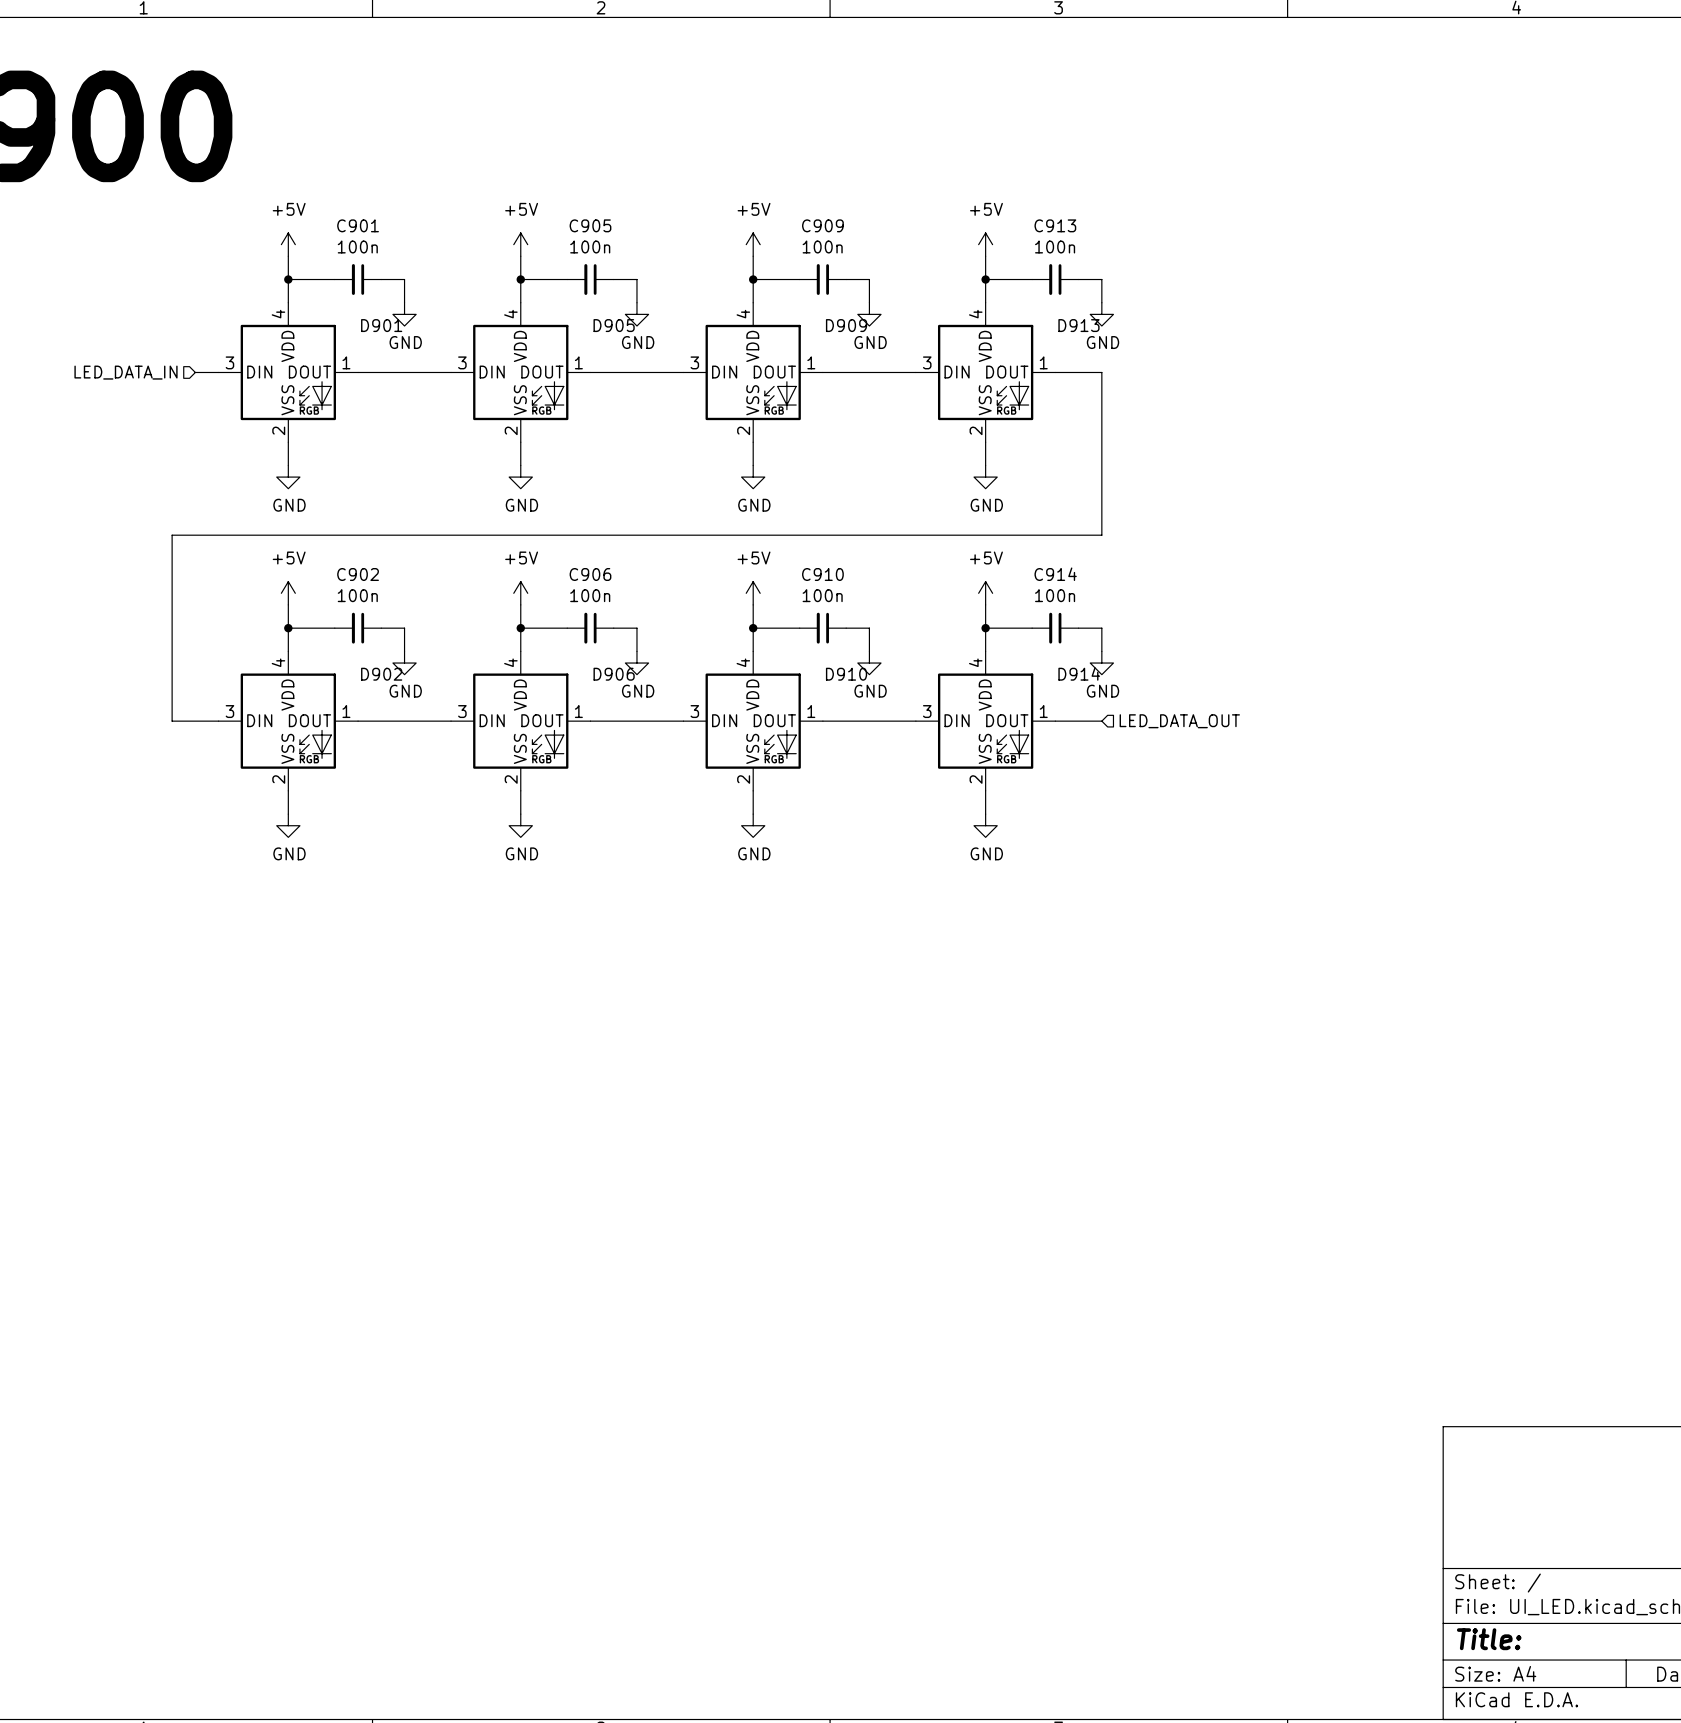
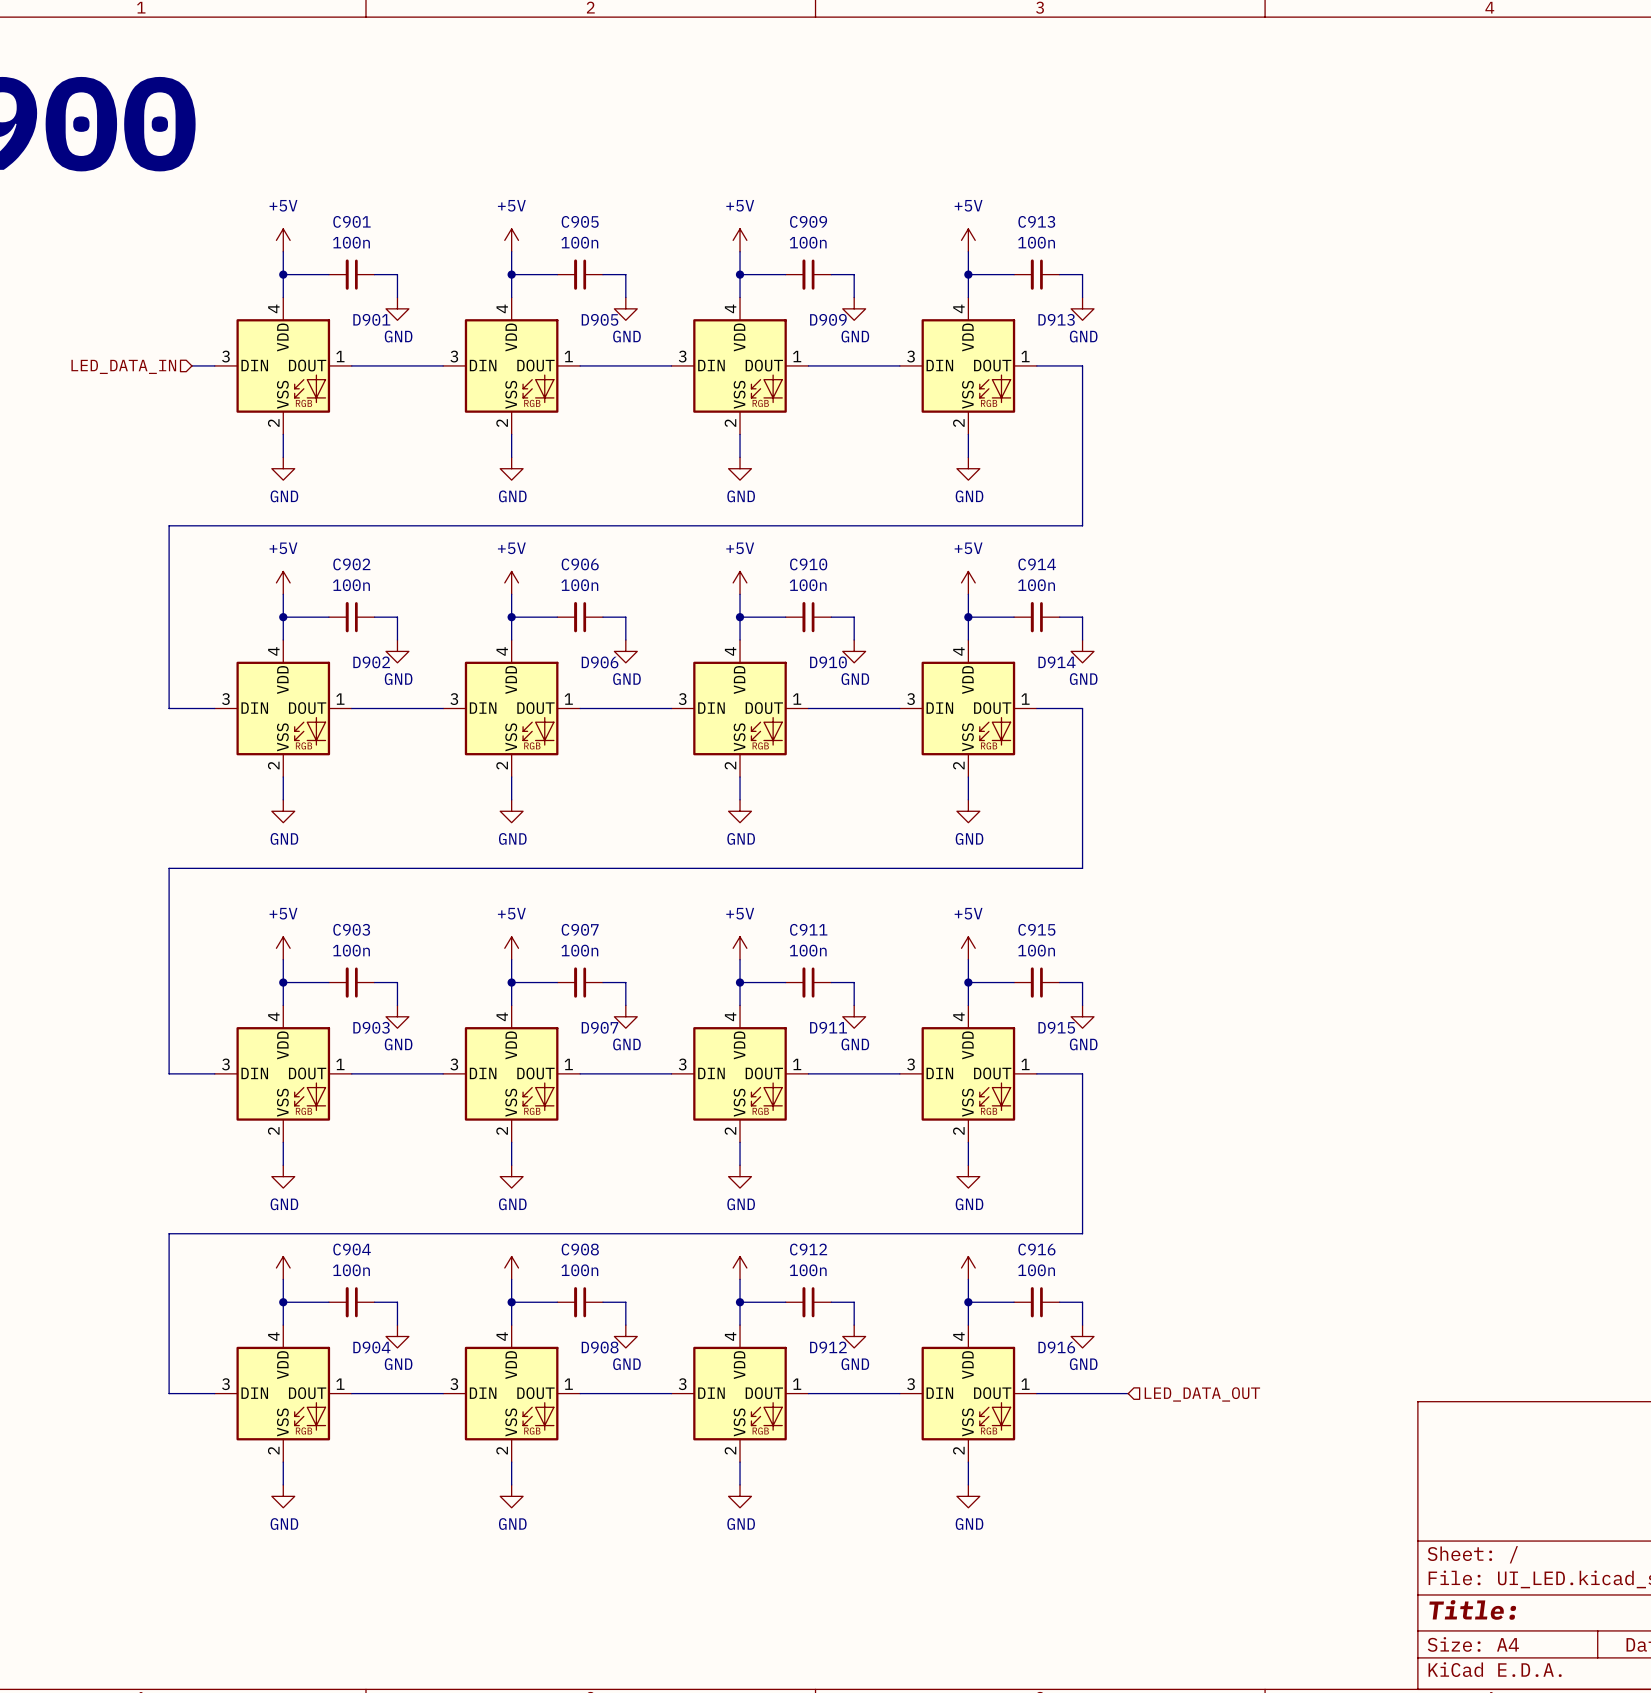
wire: none -> (1082, 708) (1082, 868) (169, 868) (169, 1073) (214, 1073)
hierarchical label: LED_DATA_OUT (1179, 721) -> none
power symbol: none -> +5V (283, 948)
power symbol: none -> +5V (511, 948)
power symbol: none -> +5V (740, 948)
power symbol: none -> +5V (968, 948)
wire: none -> (283, 959) (283, 1005)
wire: none -> (511, 959) (511, 1005)
wire: none -> (740, 959) (740, 1005)
wire: none -> (968, 959) (968, 1005)
wire: none -> (283, 982) (328, 982)
junction: none -> (283, 982)
C903: none -> 100n (351, 982)
wire: none -> (374, 982) (397, 982) (397, 1005)
wire: none -> (511, 982) (557, 982)
junction: none -> (511, 982)
C907: none -> 100n (580, 982)
wire: none -> (602, 982) (625, 982) (625, 1005)
wire: none -> (740, 982) (785, 982)
junction: none -> (740, 982)
C911: none -> 100n (808, 982)
wire: none -> (831, 982) (854, 982) (854, 1005)
wire: none -> (968, 982) (1014, 982)
junction: none -> (968, 982)
C915: none -> 100n (1036, 982)
wire: none -> (1059, 982) (1082, 982) (1082, 1005)
power symbol: none -> GND (397, 1016)
power symbol: none -> GND (625, 1016)
power symbol: none -> GND (854, 1016)
power symbol: none -> GND (1082, 1016)
D903: none -> (283, 1073)
wire: none -> (351, 1073) (443, 1073)
D907: none -> (511, 1073)
wire: none -> (580, 1073) (671, 1073)
D911: none -> (740, 1073)
wire: none -> (808, 1073) (899, 1073)
D915: none -> (968, 1073)
wire: none -> (1036, 1073) (1082, 1073) (1082, 1233) (169, 1233) (169, 1393) (214, 1393)
wire: none -> (283, 1142) (283, 1165)
wire: none -> (511, 1142) (511, 1165)
wire: none -> (740, 1142) (740, 1165)
wire: none -> (968, 1142) (968, 1165)
power symbol: none -> GND (283, 1176)
power symbol: none -> GND (511, 1176)
power symbol: none -> GND (740, 1176)
power symbol: none -> GND (968, 1176)
power symbol: none -> (283, 1267)
power symbol: none -> (511, 1267)
power symbol: none -> (740, 1267)
power symbol: none -> (968, 1267)
wire: none -> (283, 1279) (283, 1325)
wire: none -> (511, 1279) (511, 1325)
wire: none -> (740, 1279) (740, 1325)
wire: none -> (968, 1279) (968, 1325)
wire: none -> (283, 1302) (328, 1302)
junction: none -> (283, 1302)
C904: none -> 100n (351, 1302)
wire: none -> (374, 1302) (397, 1302) (397, 1325)
wire: none -> (511, 1302) (557, 1302)
junction: none -> (511, 1302)
C908: none -> 100n (580, 1302)
wire: none -> (602, 1302) (625, 1302) (625, 1325)
wire: none -> (740, 1302) (785, 1302)
junction: none -> (740, 1302)
C912: none -> 100n (808, 1302)
wire: none -> (831, 1302) (854, 1302) (854, 1325)
wire: none -> (968, 1302) (1014, 1302)
junction: none -> (968, 1302)
C916: none -> 100n (1036, 1302)
wire: none -> (1059, 1302) (1082, 1302) (1082, 1325)
power symbol: none -> GND (397, 1336)
power symbol: none -> GND (625, 1336)
power symbol: none -> GND (854, 1336)
power symbol: none -> GND (1082, 1336)
D904: none -> (283, 1393)
wire: none -> (351, 1393) (443, 1393)
D908: none -> (511, 1393)
wire: none -> (580, 1393) (671, 1393)
D912: none -> (740, 1393)
wire: none -> (808, 1393) (899, 1393)
D916: none -> (968, 1393)
wire: none -> (1036, 1393) (1128, 1393)
hierarchical label: none -> LED_DATA_OUT (1202, 1394)
wire: none -> (283, 1462) (283, 1484)
wire: none -> (511, 1462) (511, 1484)
wire: none -> (740, 1462) (740, 1484)
wire: none -> (968, 1462) (968, 1484)
power symbol: none -> GND (283, 1496)
power symbol: none -> GND (511, 1496)
power symbol: none -> GND (740, 1496)
power symbol: none -> GND (968, 1496)

